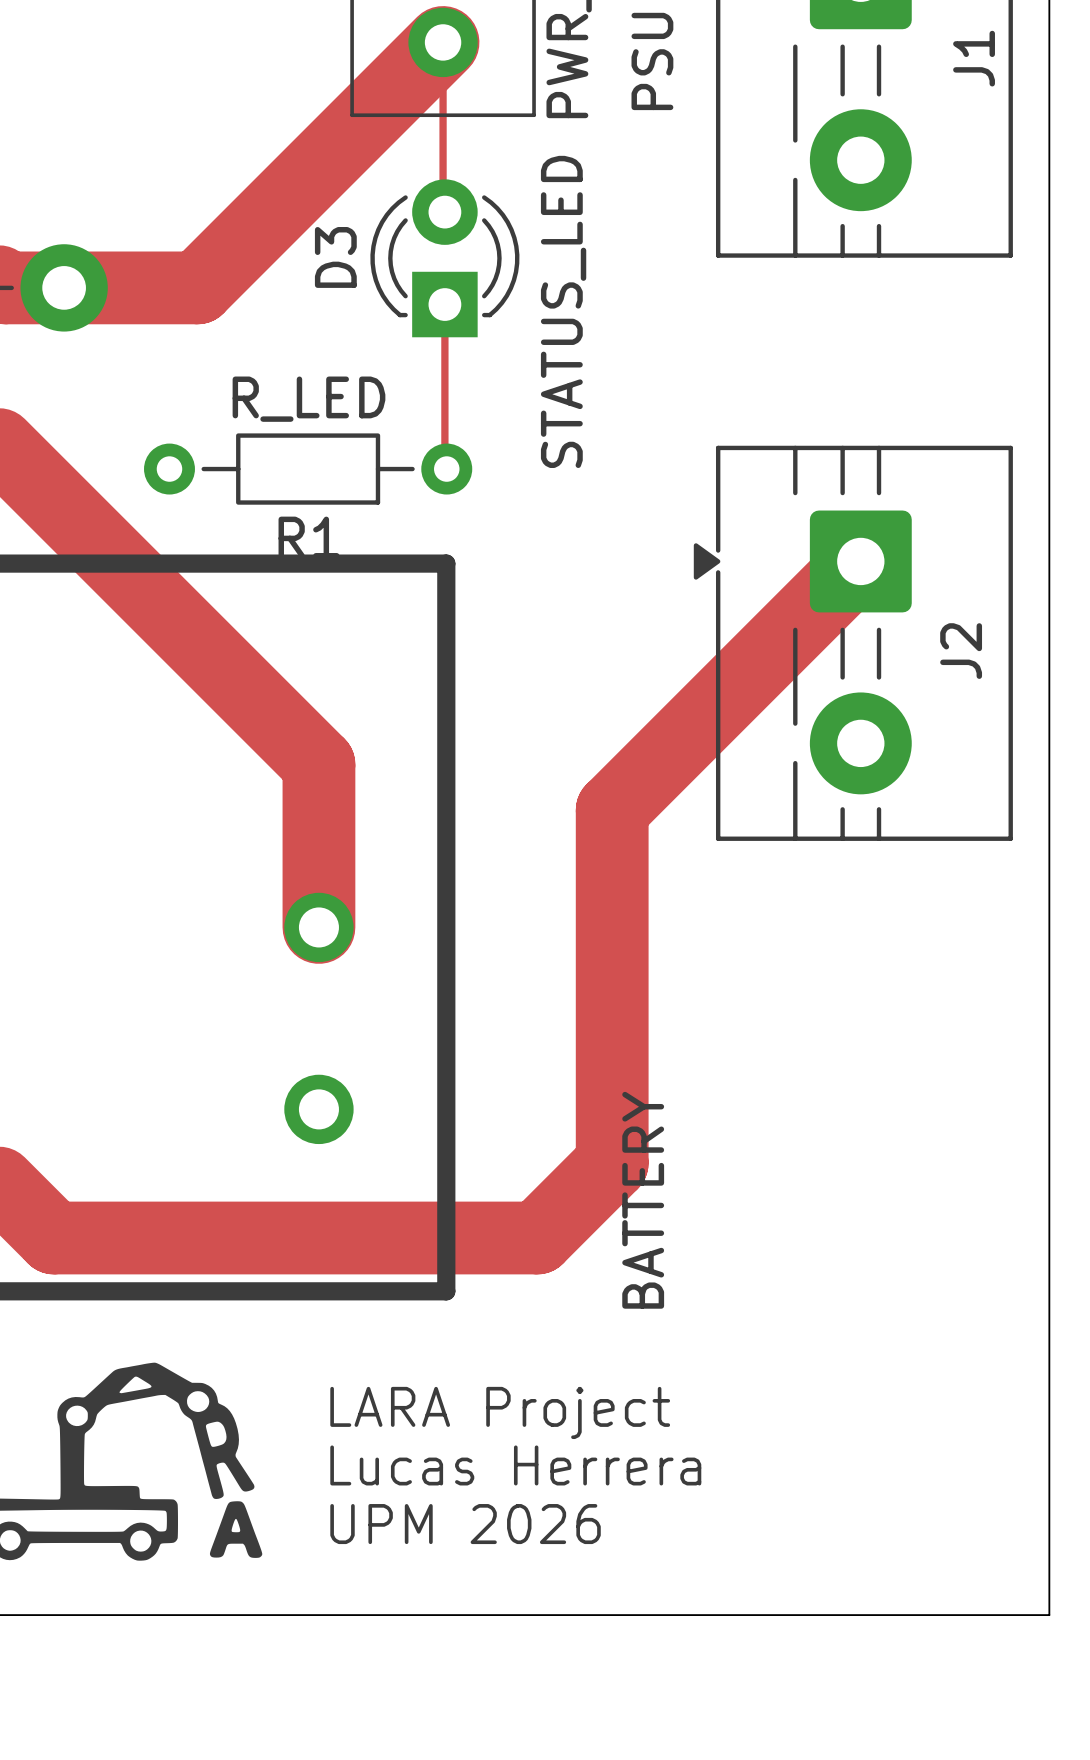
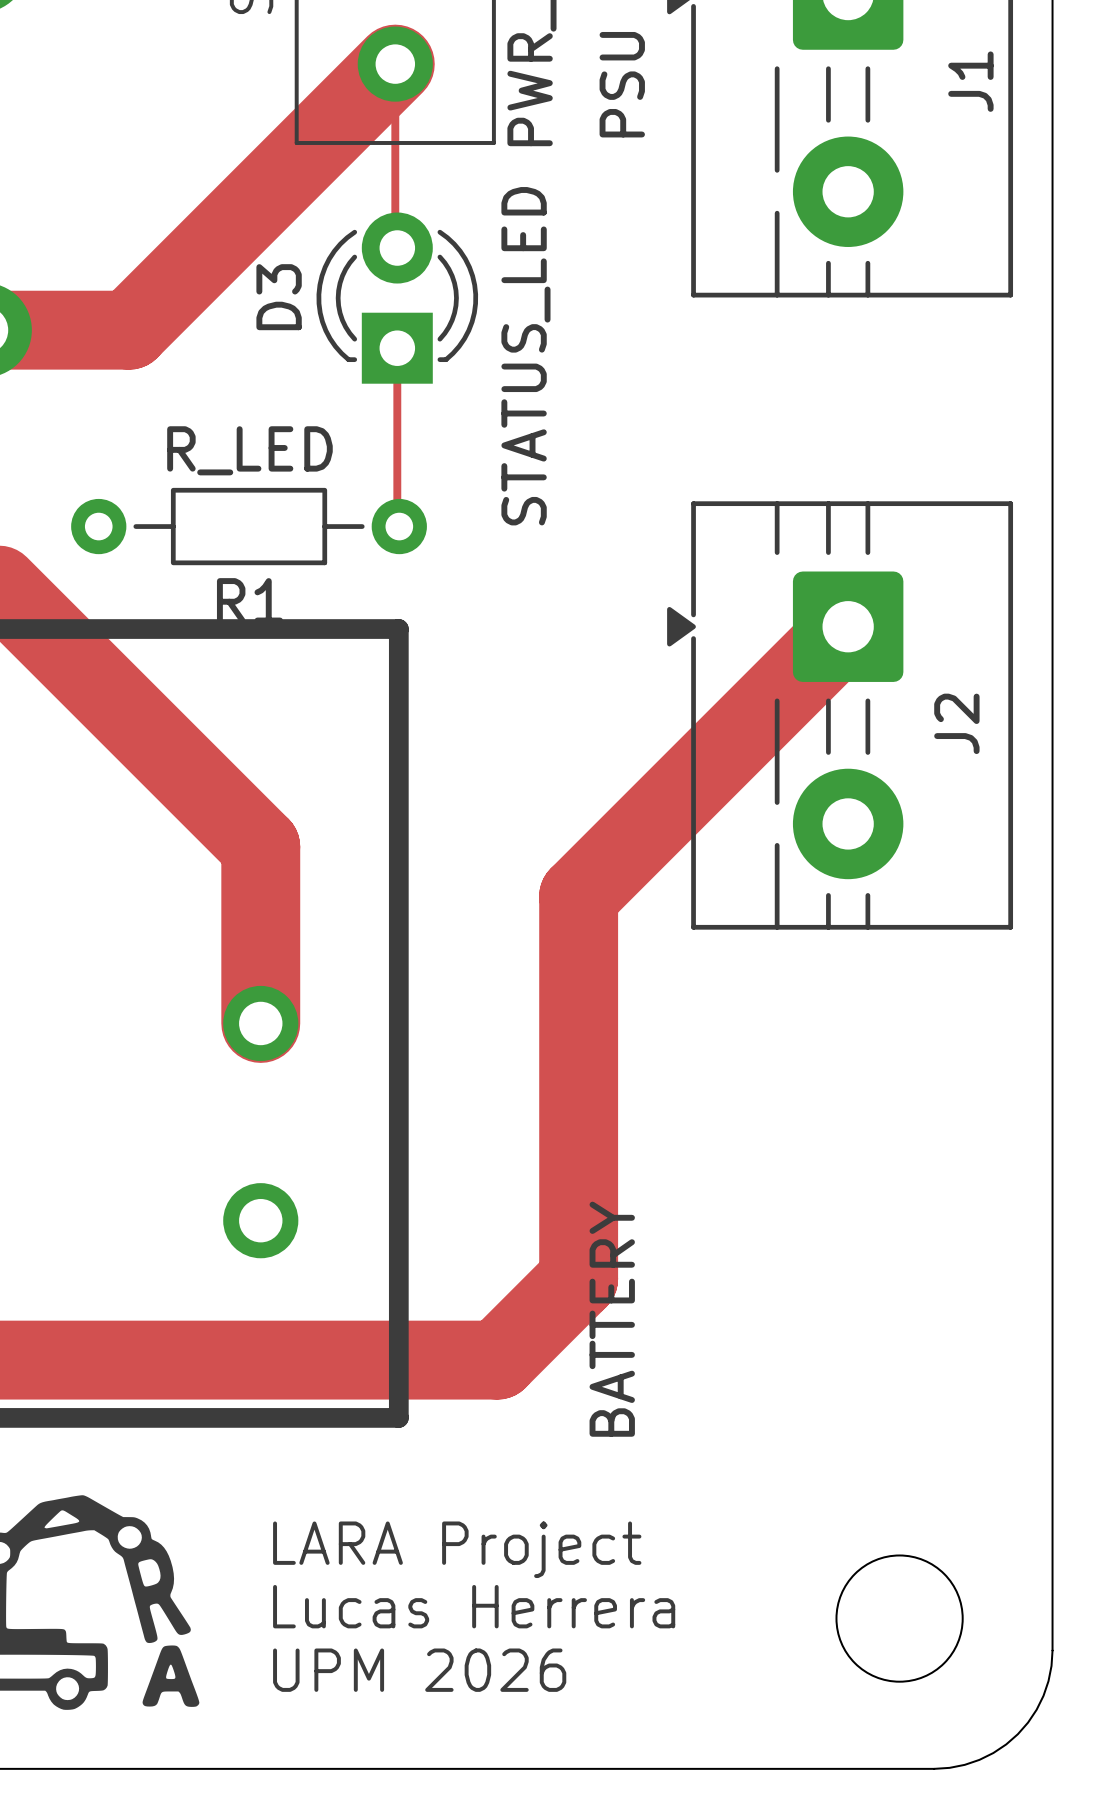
round board edge: none -> [835, 1554, 964, 1683]
board edge: (1049, 1505) (1049, 1615) (940, 1615) -> (1052, 1650) (1048, 1681) (1043, 1695) (1028, 1722) (1017, 1734) (1006, 1744) (979, 1759) (964, 1764) (934, 1768)

